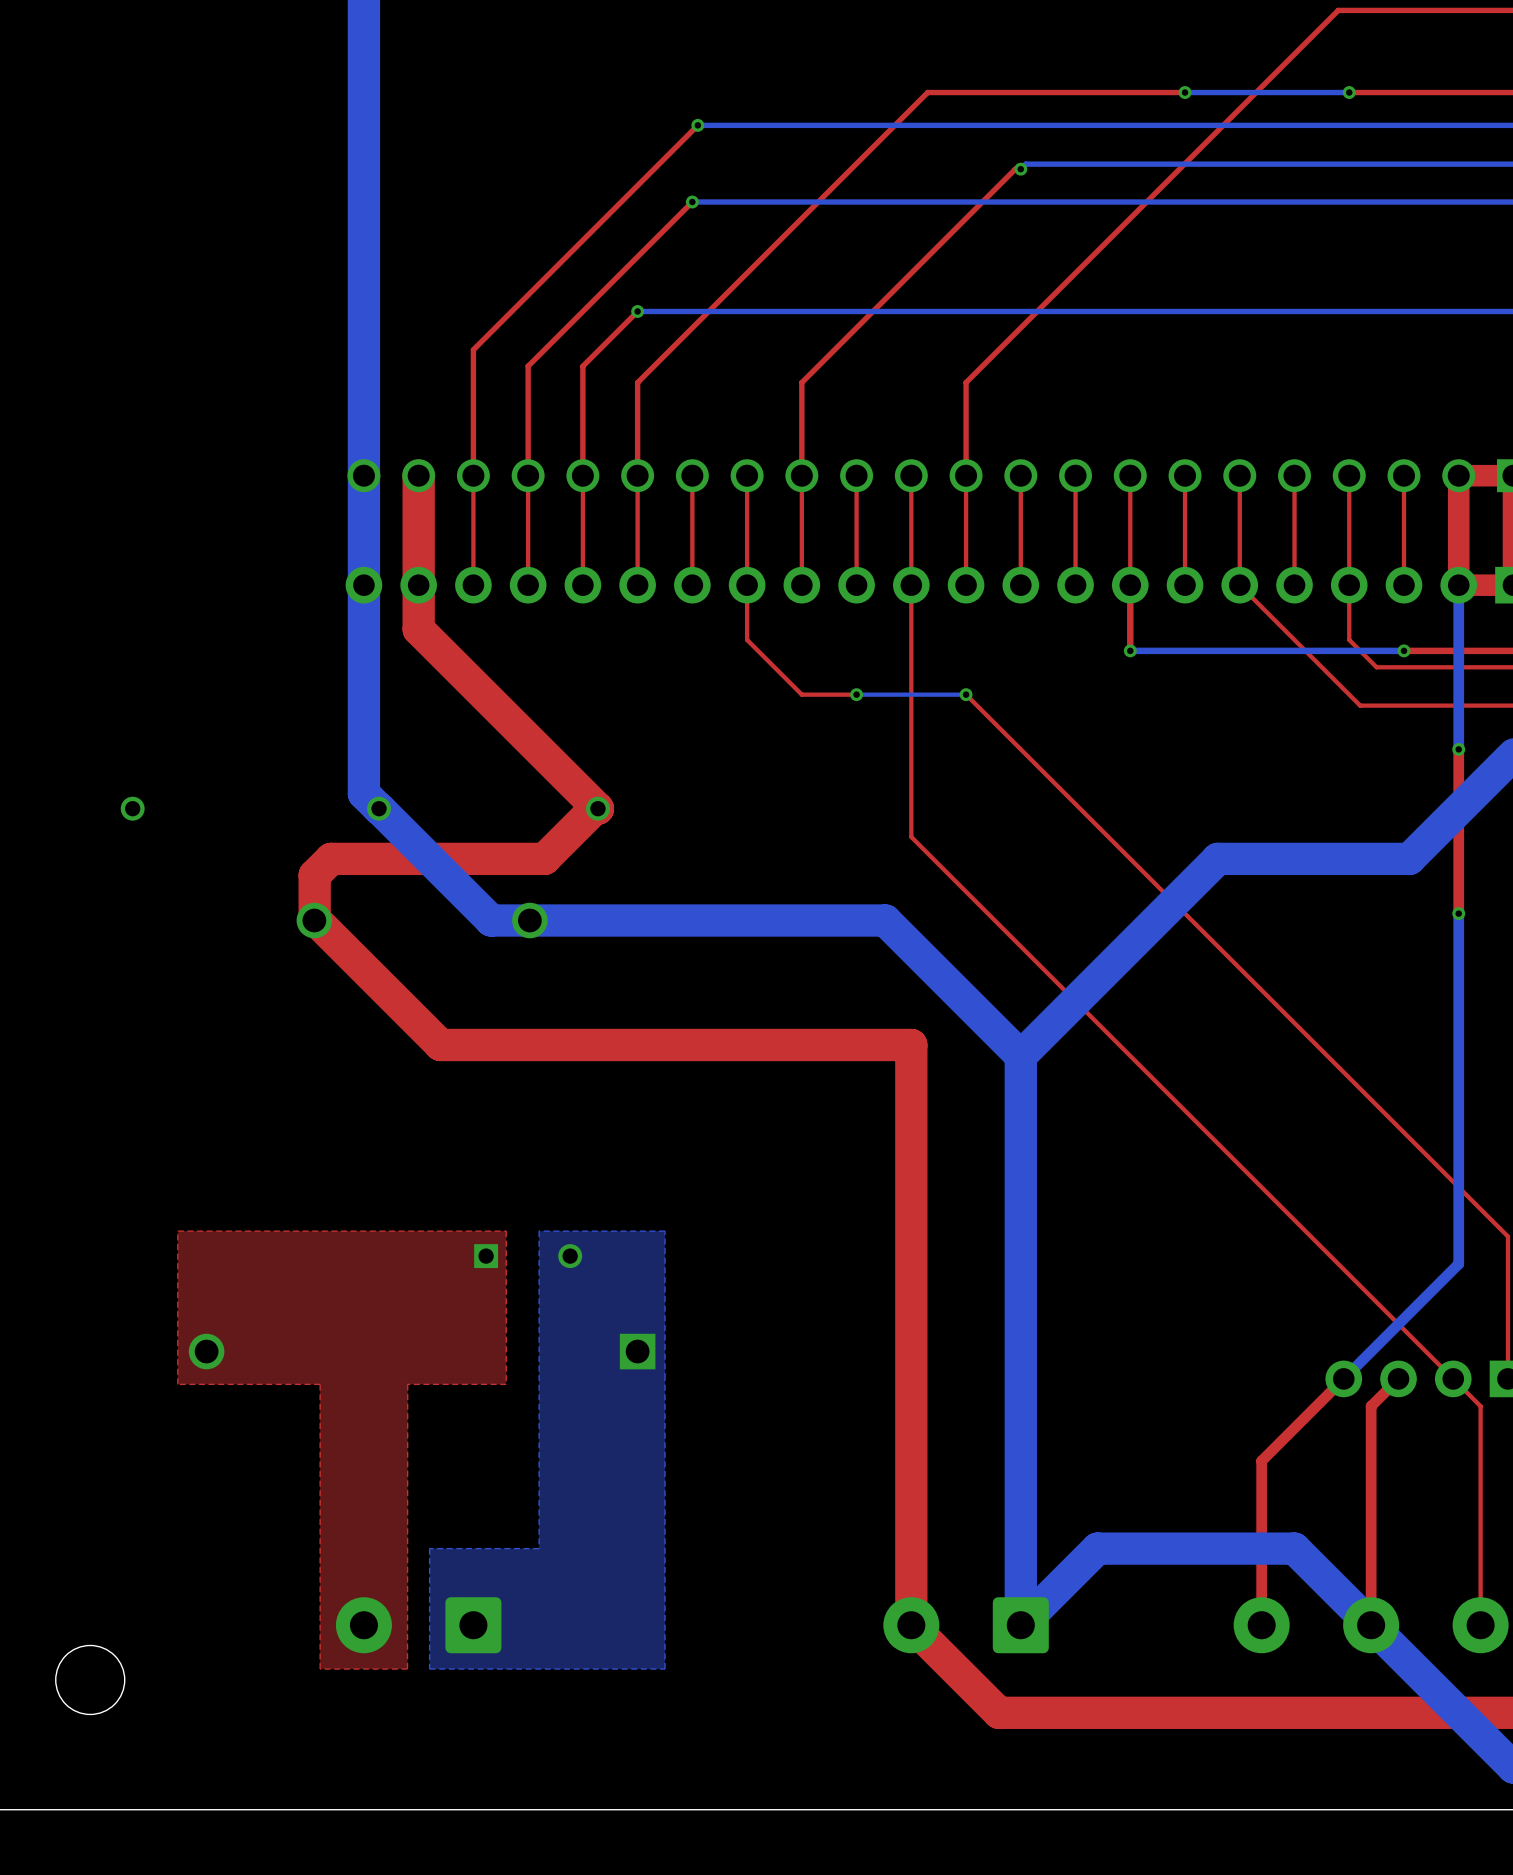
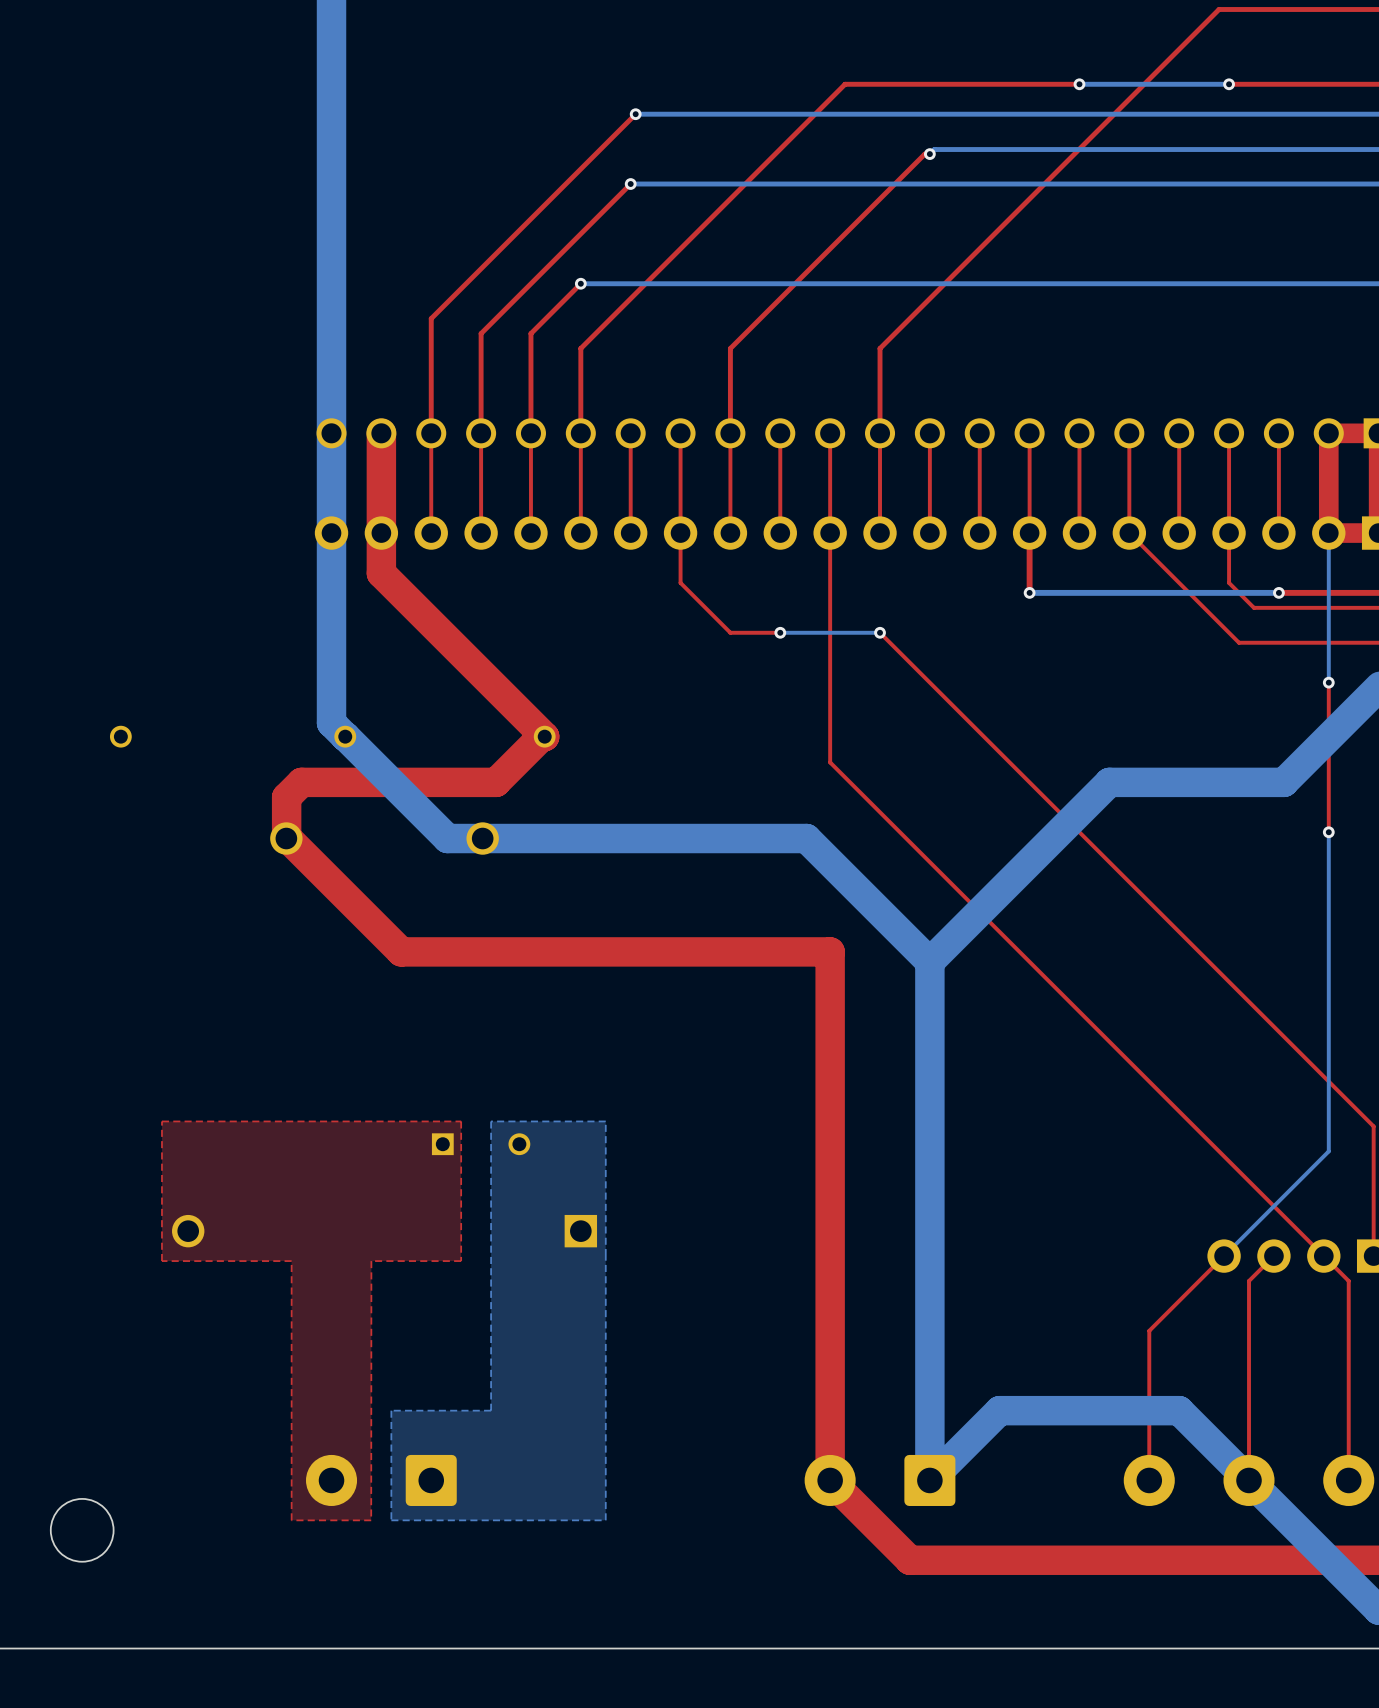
bottom track width: thick (1458, 585) (1458, 749) -> thin (1328, 533) (1328, 682)
top track width: thick (1458, 749) (1458, 913) -> thin (1328, 682) (1328, 832)
bottom track width: thick (1458, 913) (1458, 1263) (1343, 1378) -> thin (1328, 832) (1328, 1151) (1224, 1256)
top track width: thick (1343, 1378) (1261, 1461) (1261, 1625) -> thin (1224, 1256) (1149, 1330) (1149, 1480)
top track width: thick (1398, 1378) (1371, 1406) (1371, 1625) -> thin (1273, 1256) (1249, 1281) (1249, 1480)

